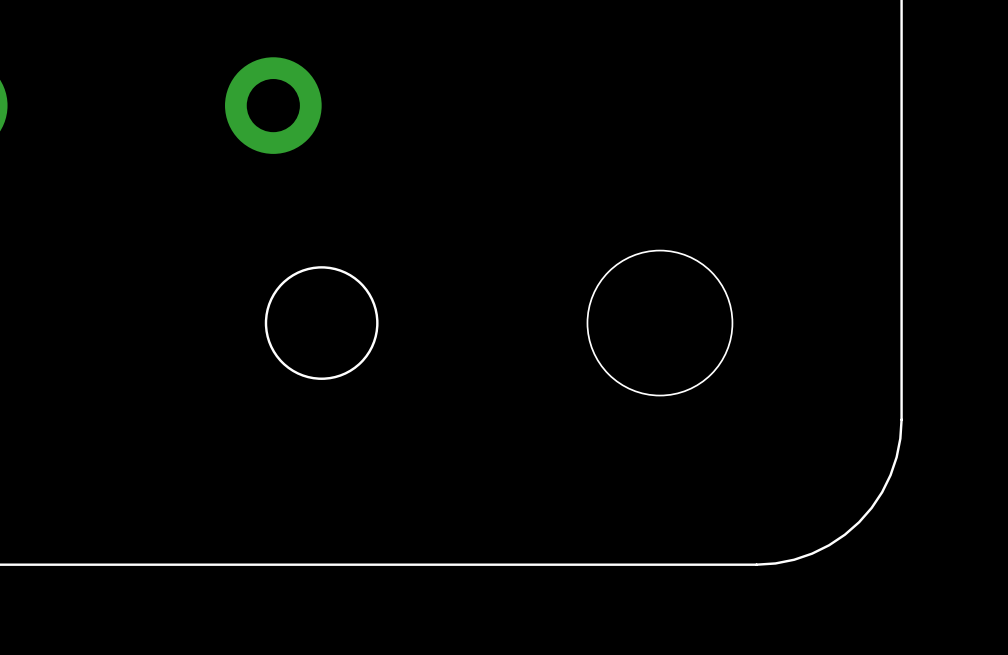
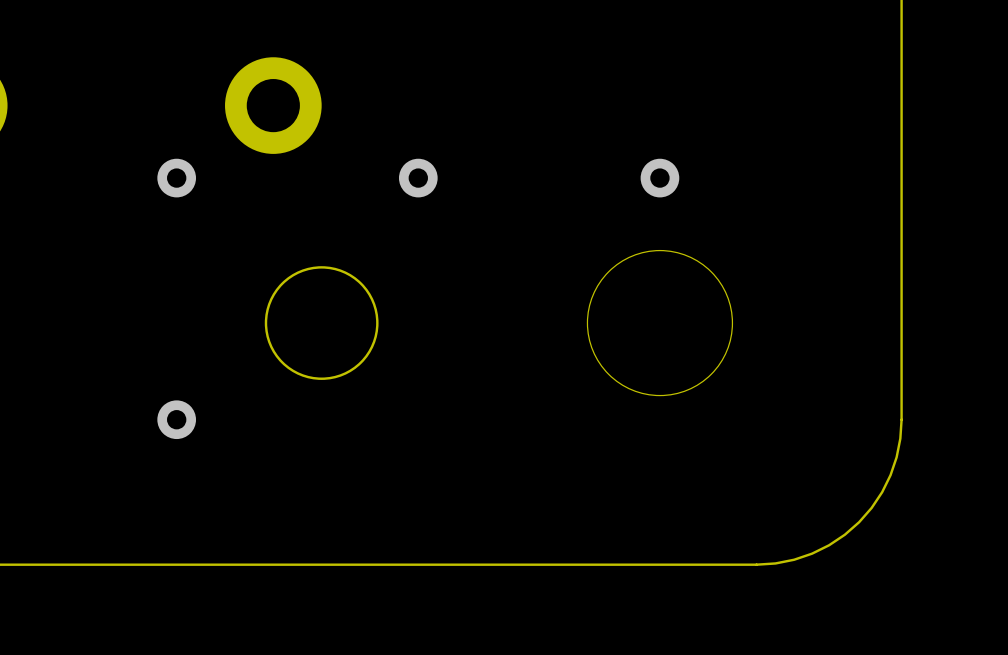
via: none -> (176, 178)
via: none -> (418, 178)
via: none -> (659, 178)
via: none -> (176, 419)

